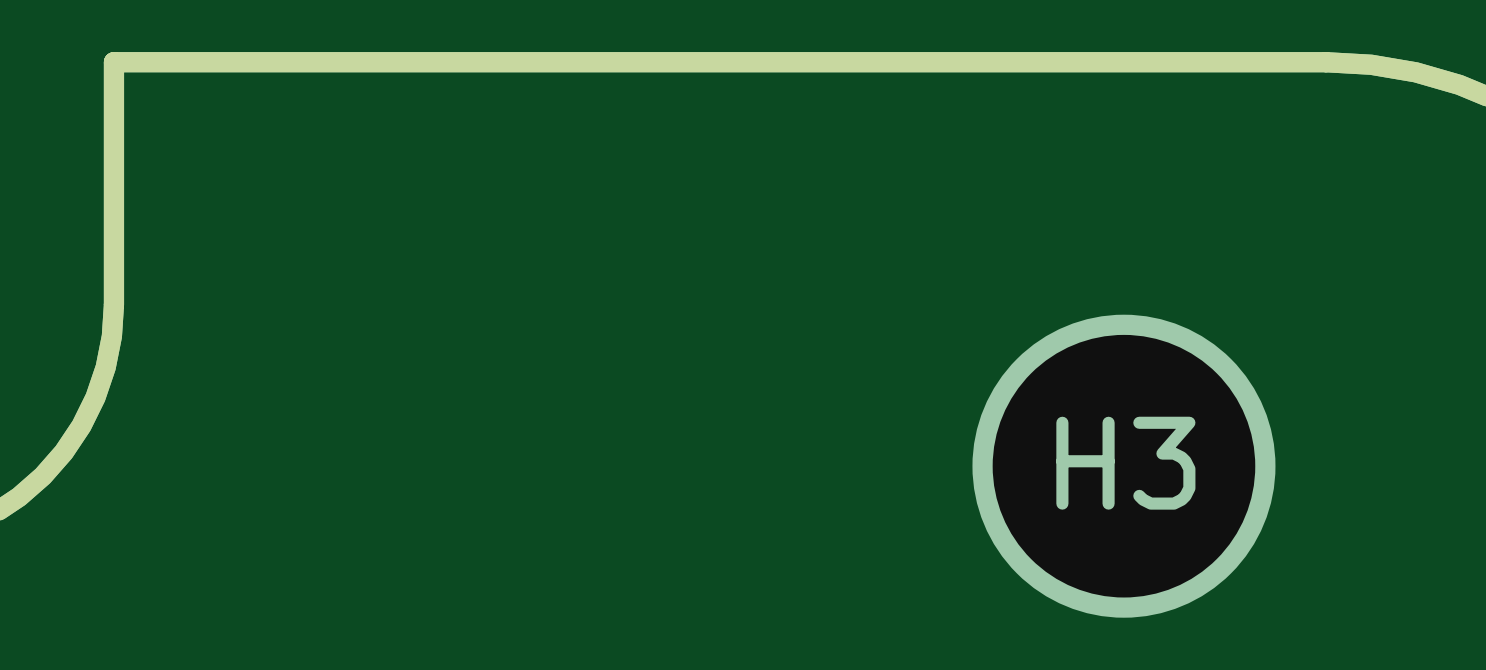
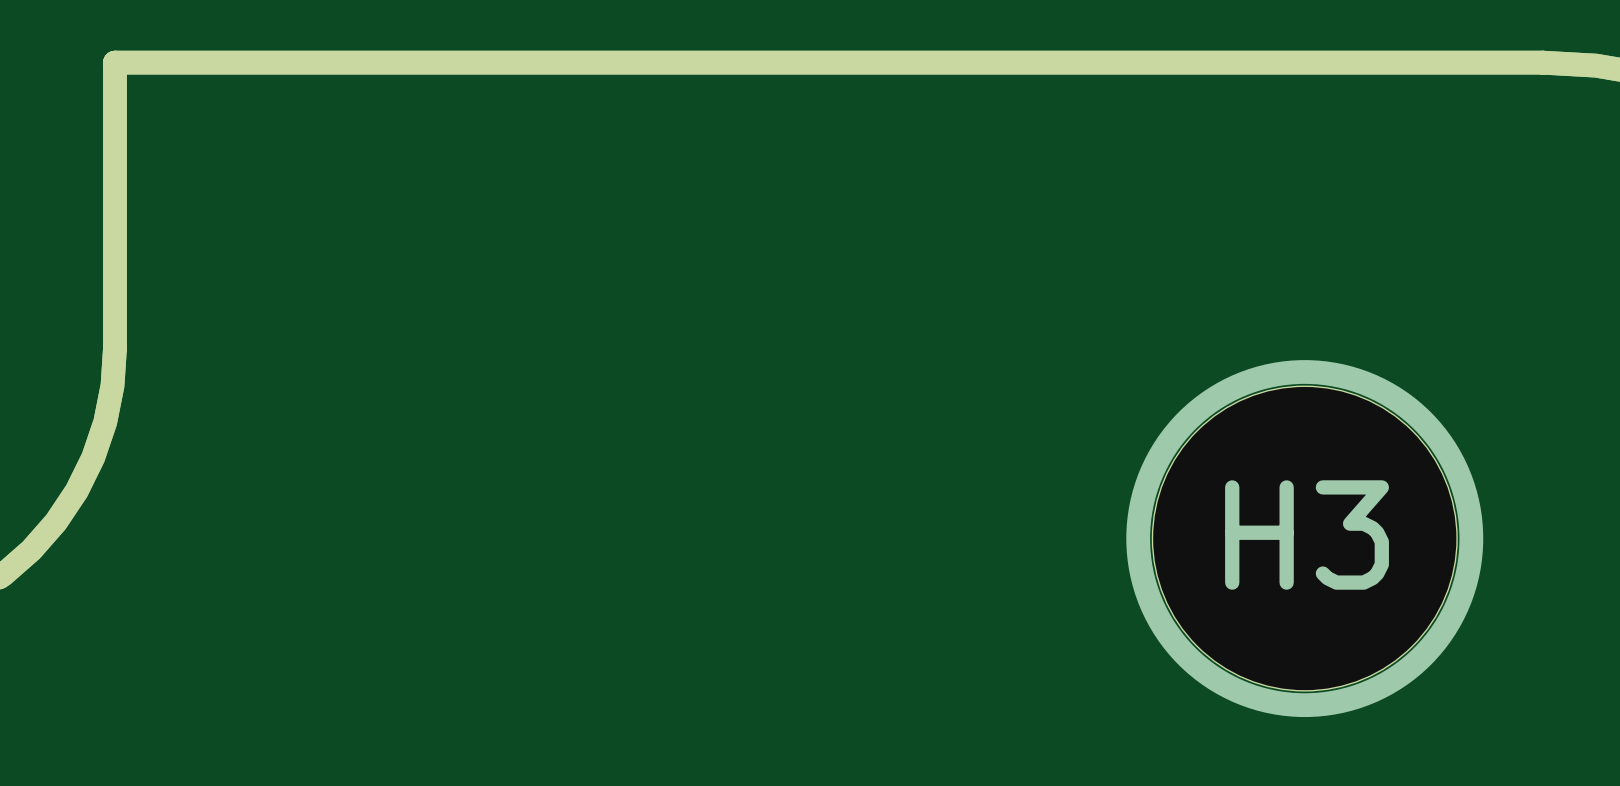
H3 footprint: [982, 324, 1266, 608] -> [1152, 386, 1458, 691]

